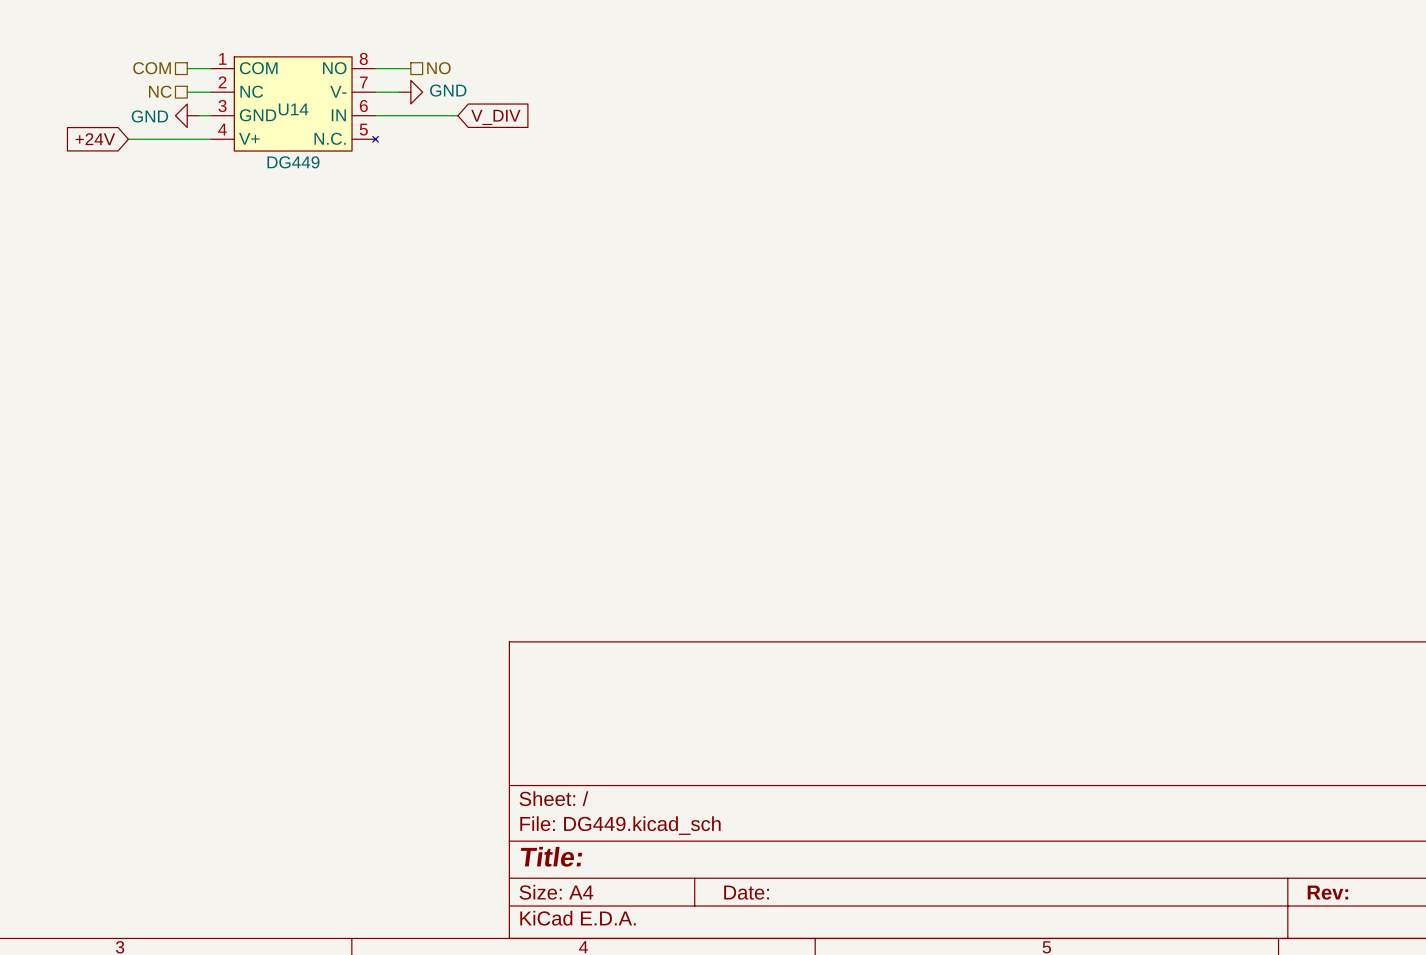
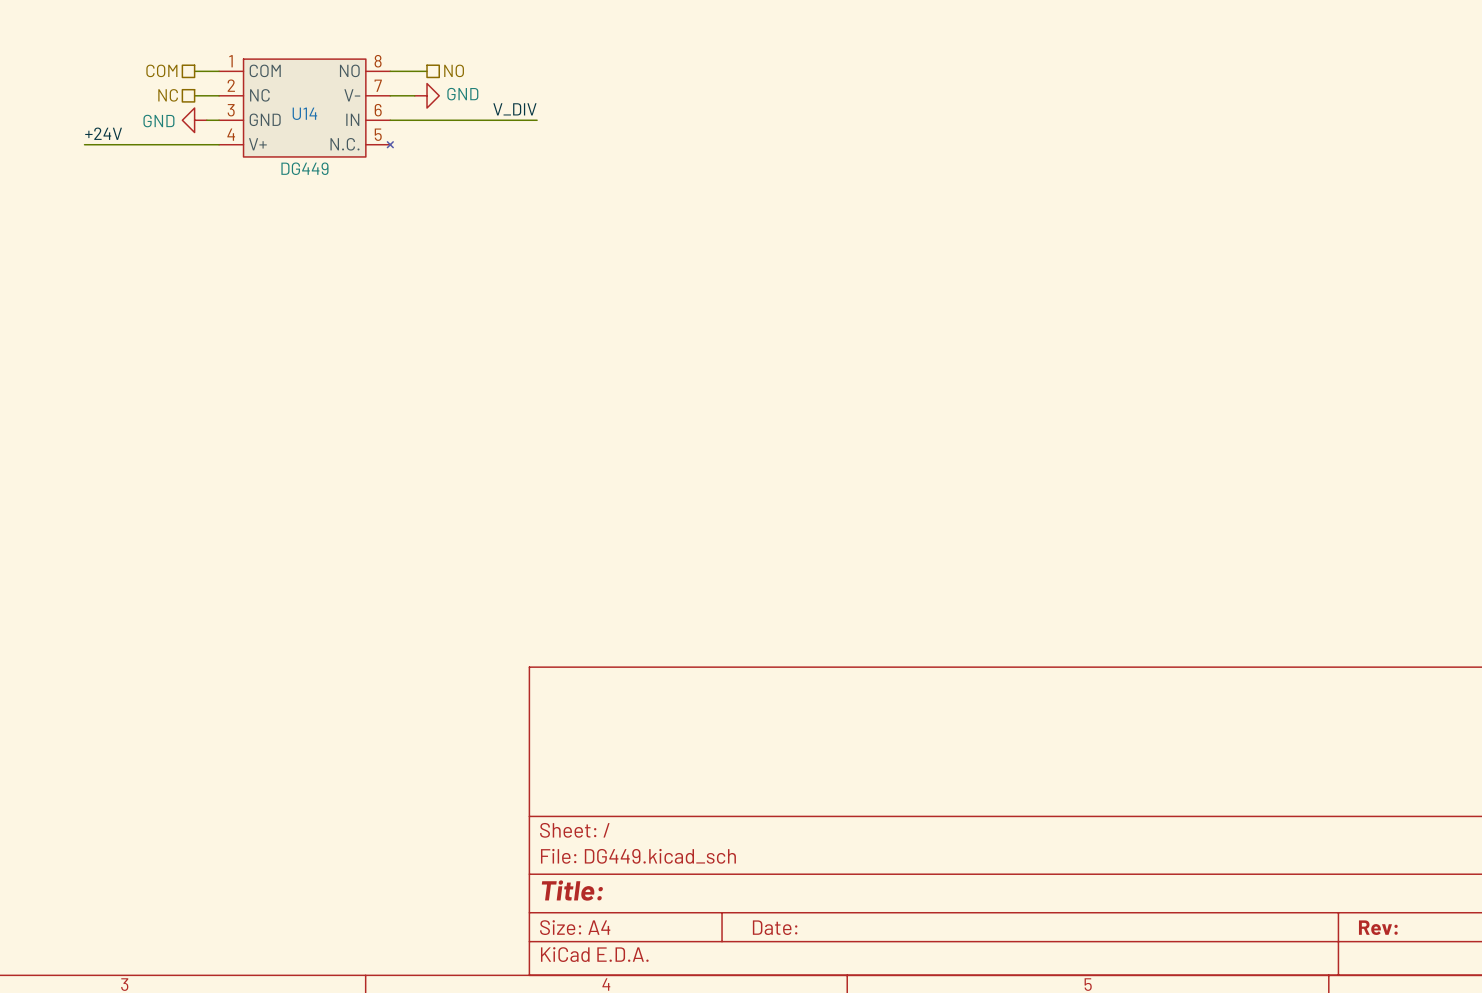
label: none -> V_DIV (514, 109)
wire: none -> (475, 120) (537, 120)
global label: V_DIV (495, 117) -> none
label: none -> +24V (103, 133)
wire: none -> (84, 144) (133, 144)
global label: +24V (95, 139) -> none

